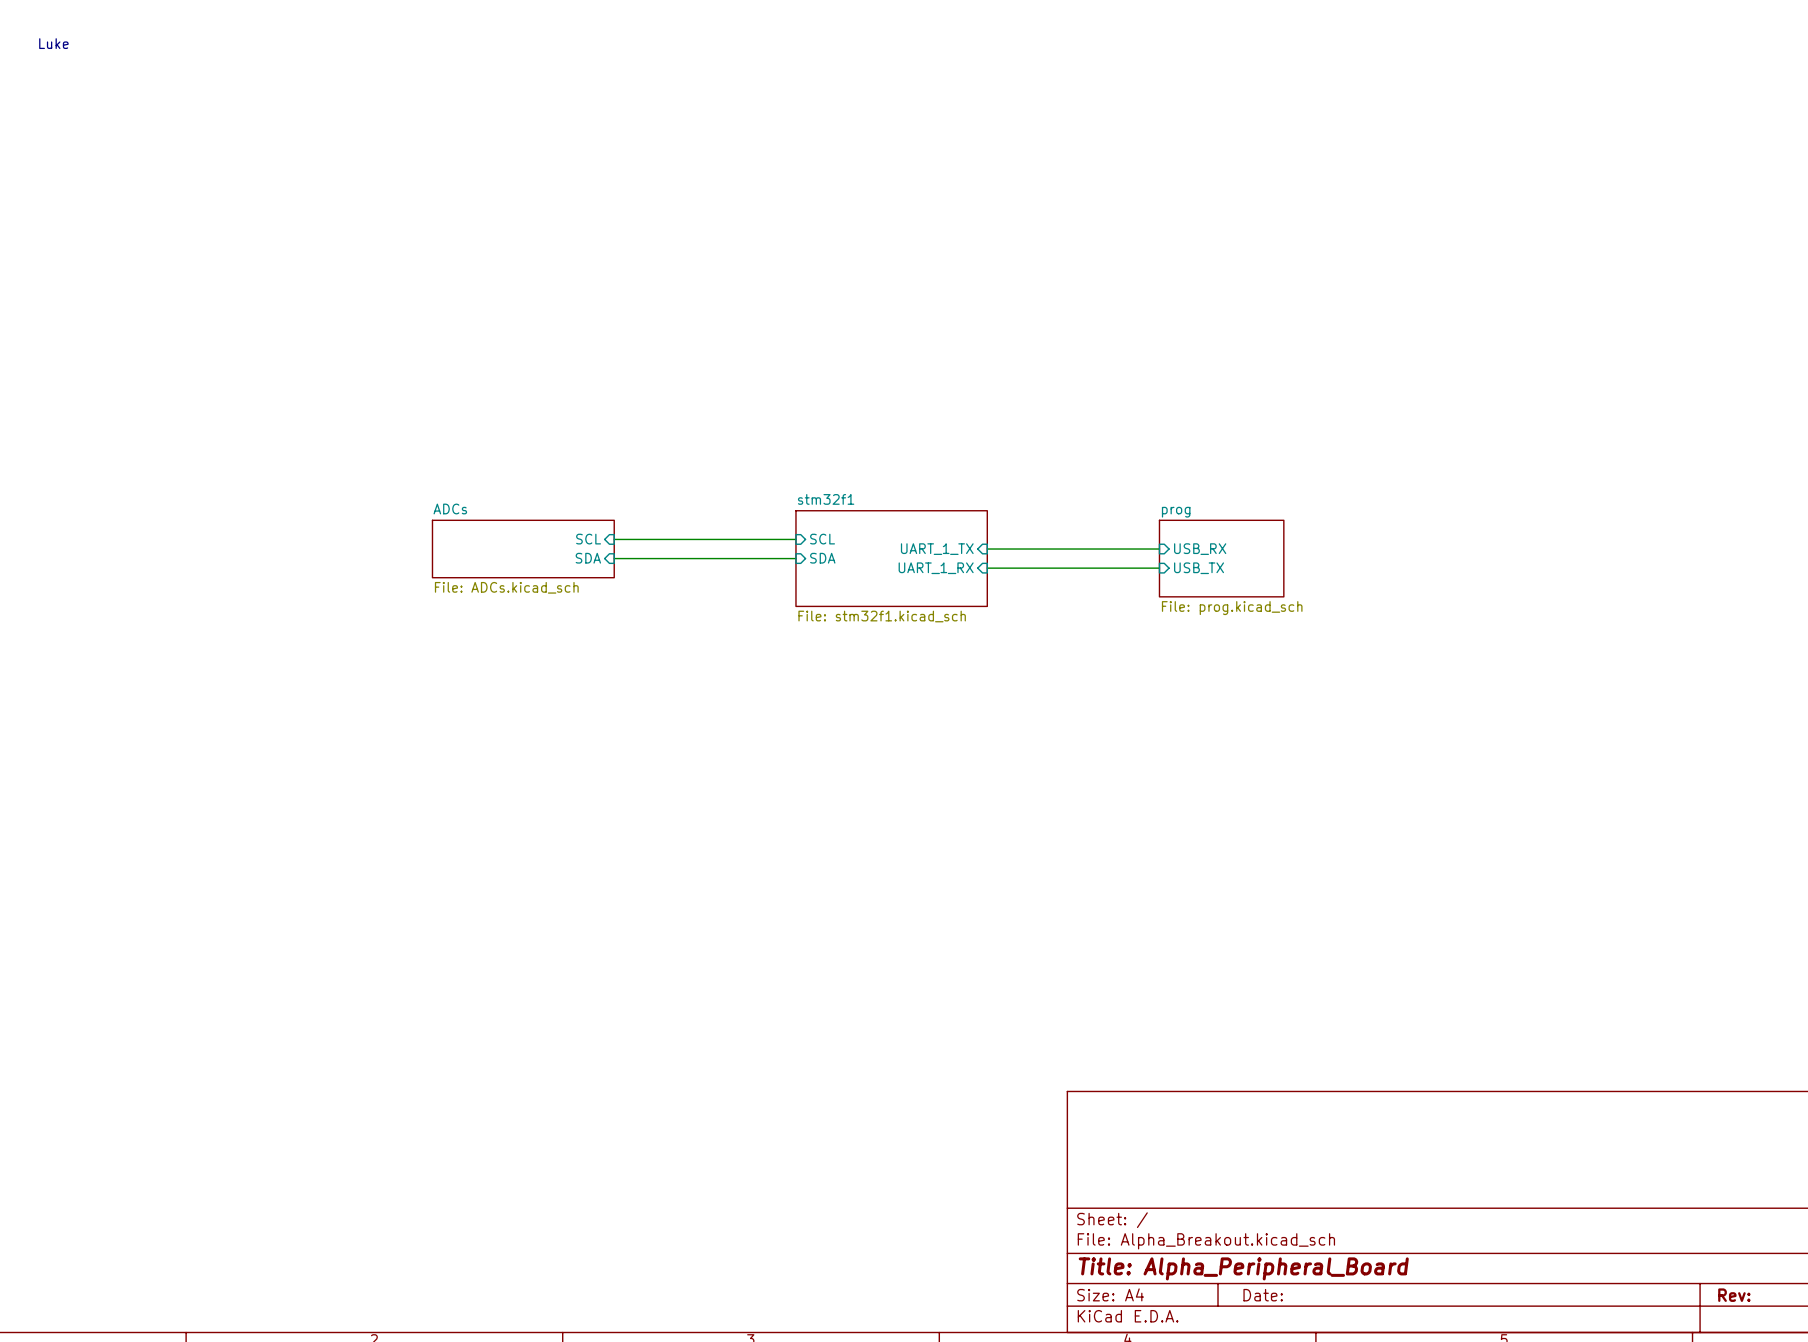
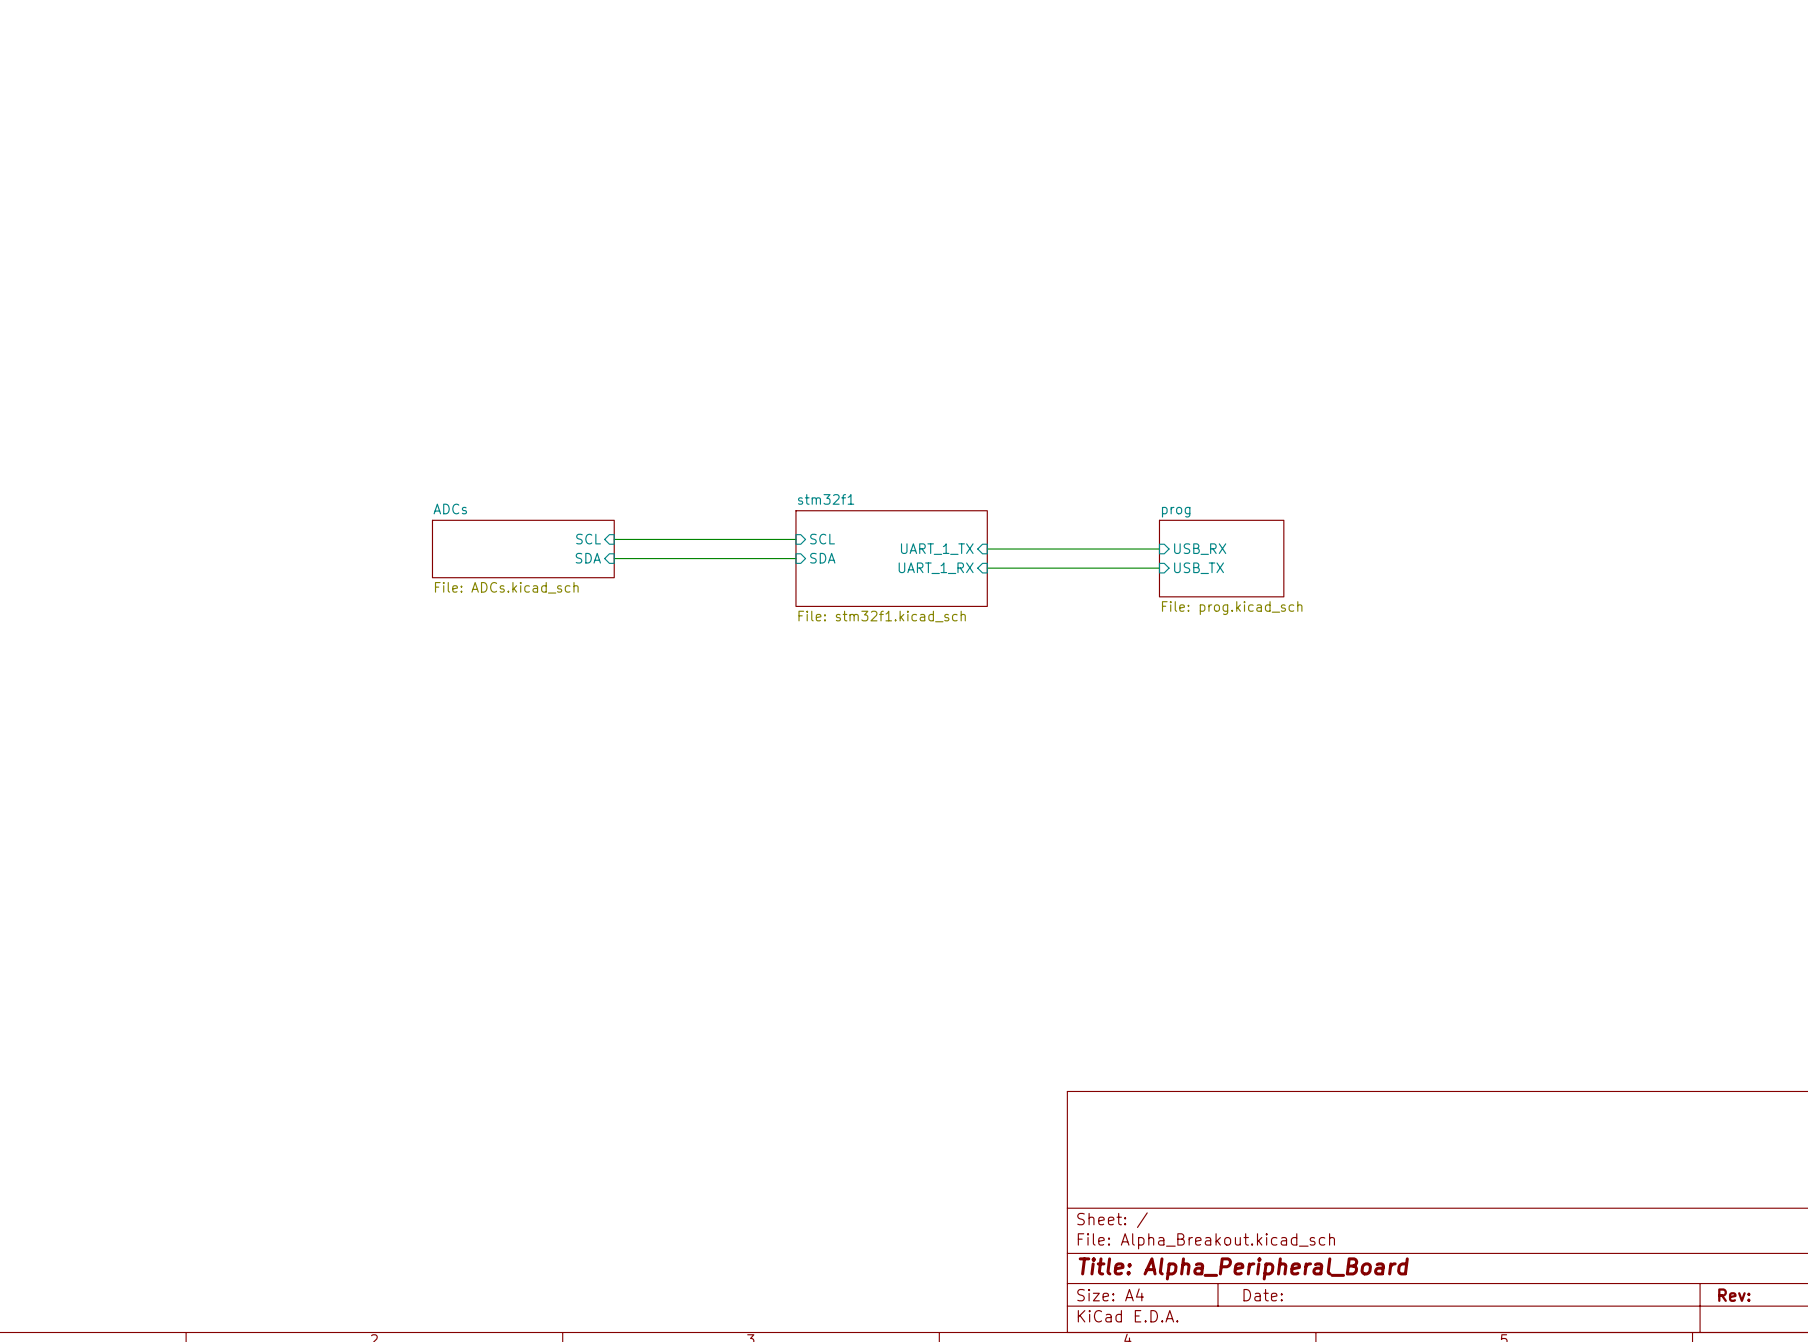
text: Luke (53, 43) -> none

